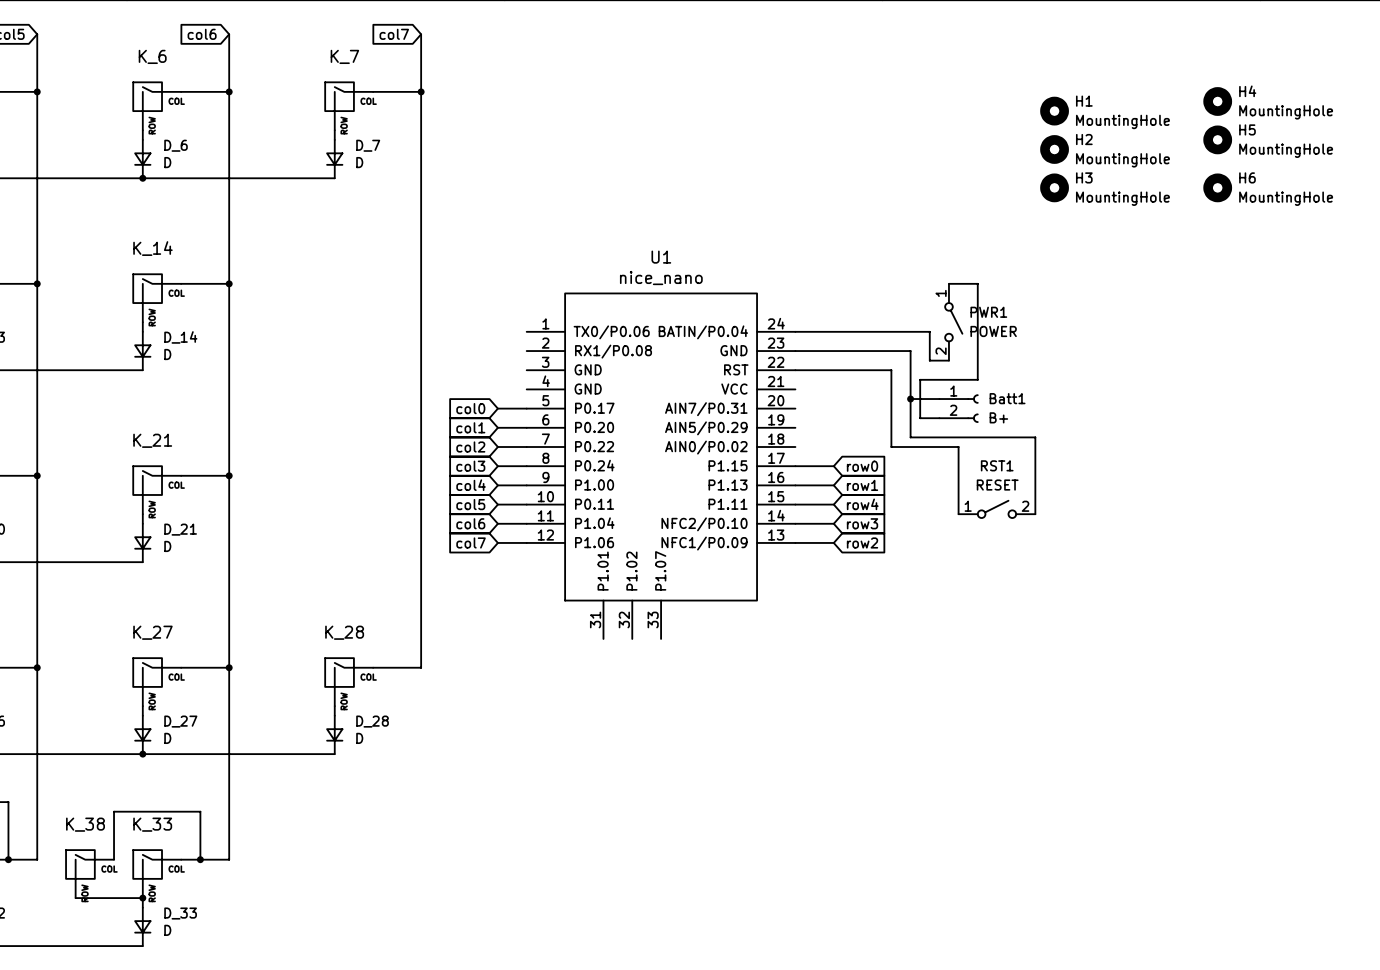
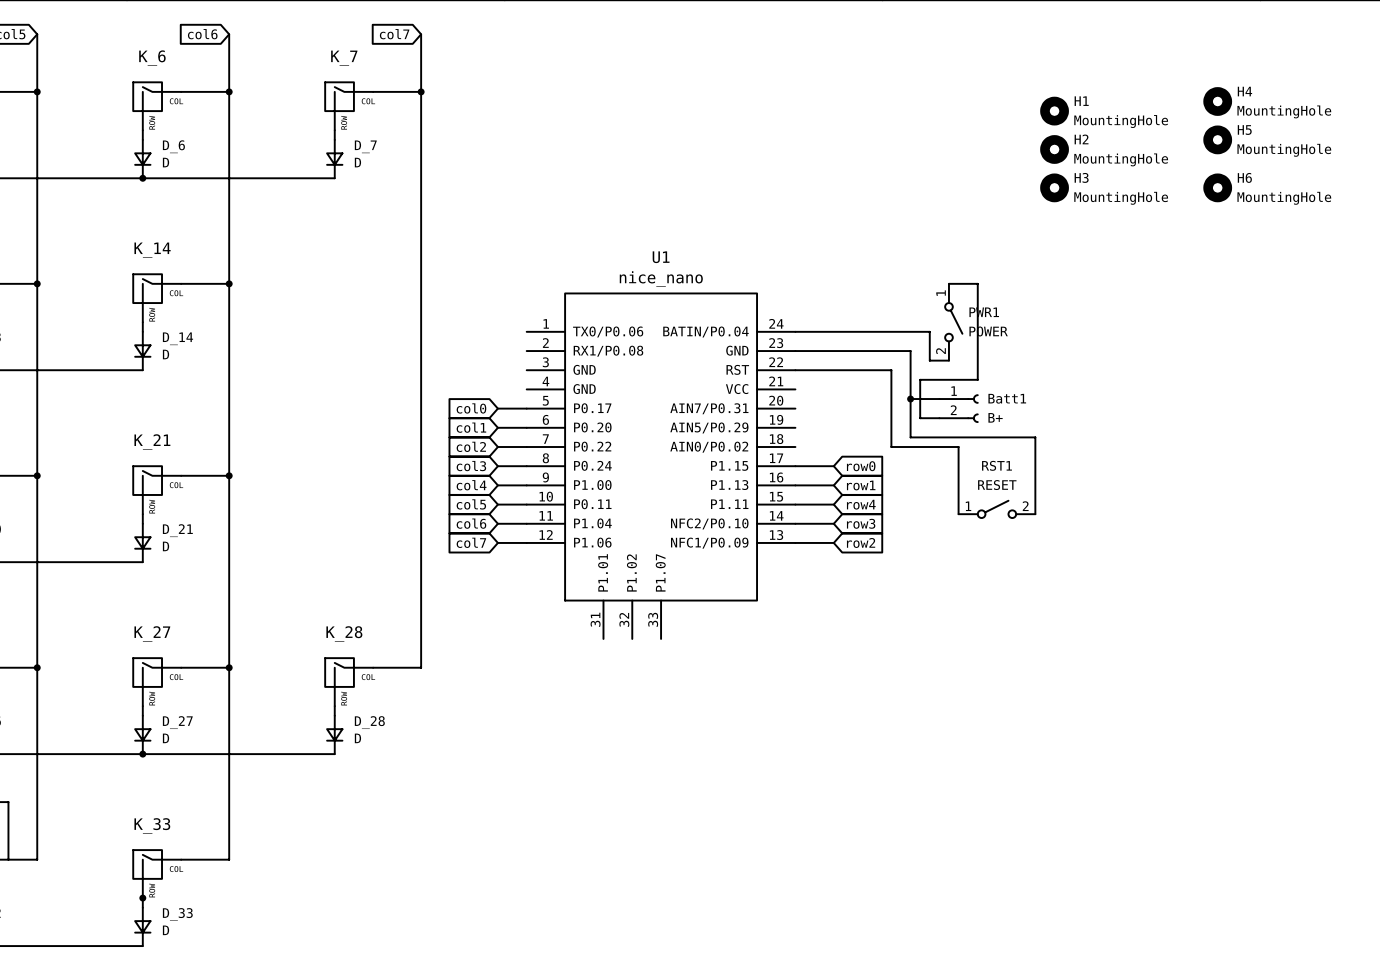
junction: (8, 859) -> none
wire: (114, 859) (114, 811) (200, 811) (200, 859) -> none
junction: (200, 859) -> none
K_38: (90, 874) -> none
wire: (75, 898) (142, 898) -> none

